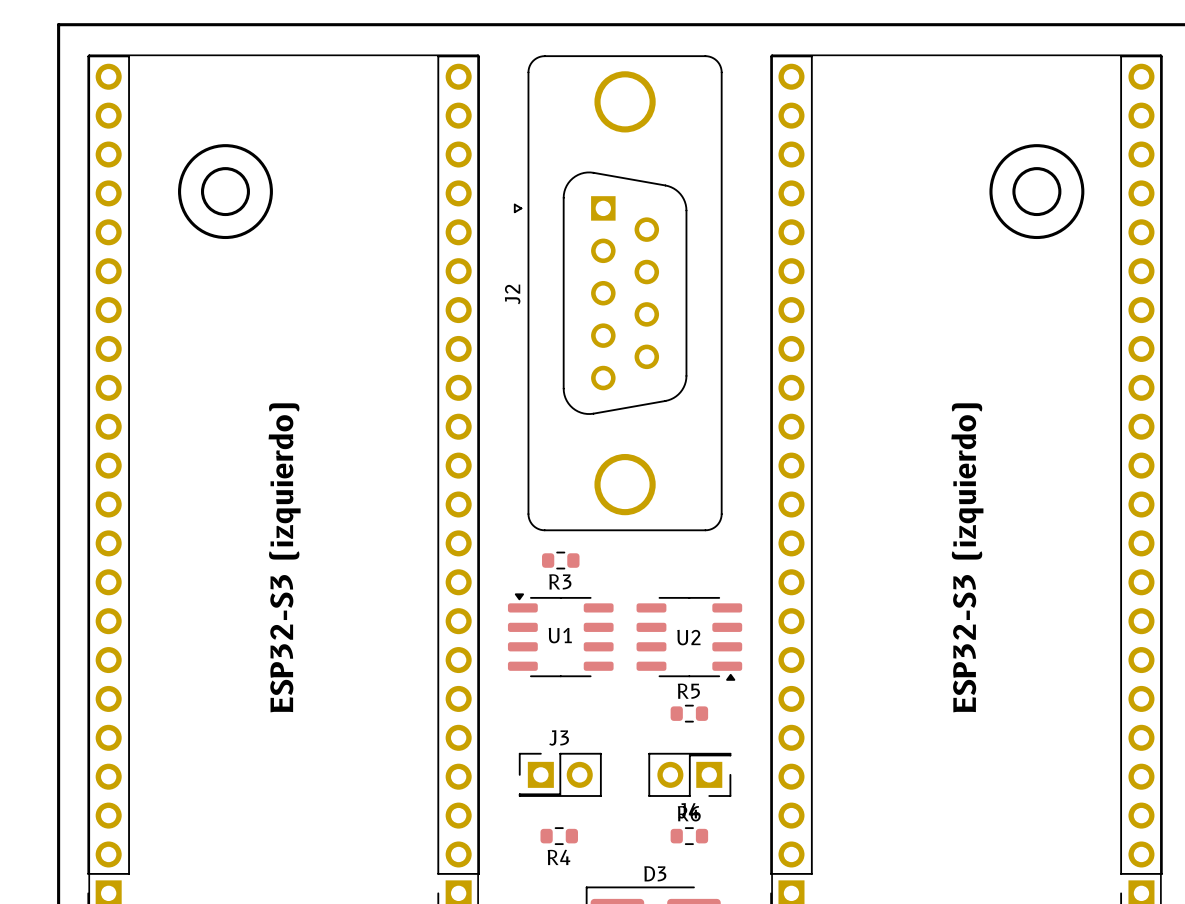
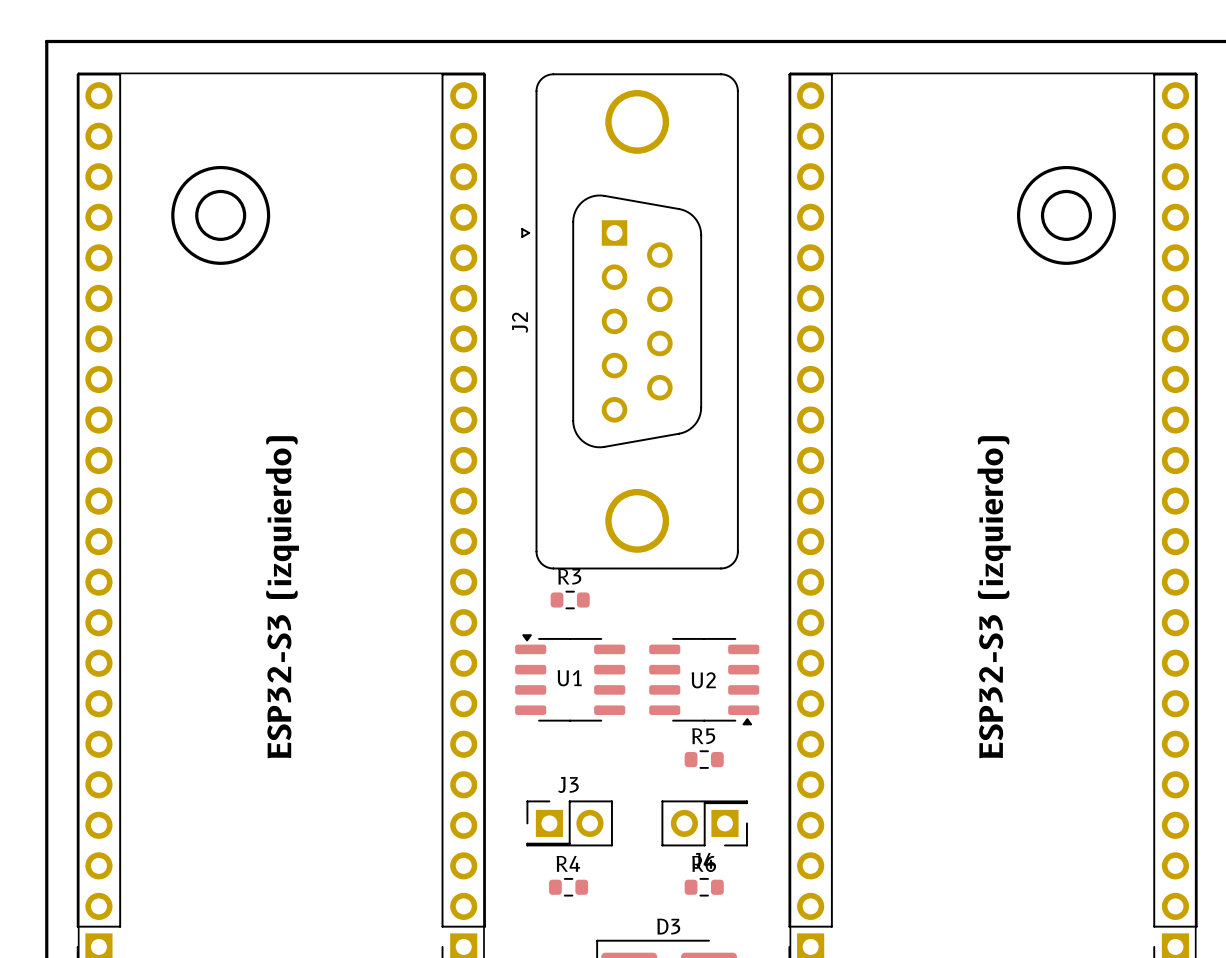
R3 name position: R3 (560, 581) -> R3 (569, 576)
R4 name position: R4 (559, 857) -> R4 (568, 863)

